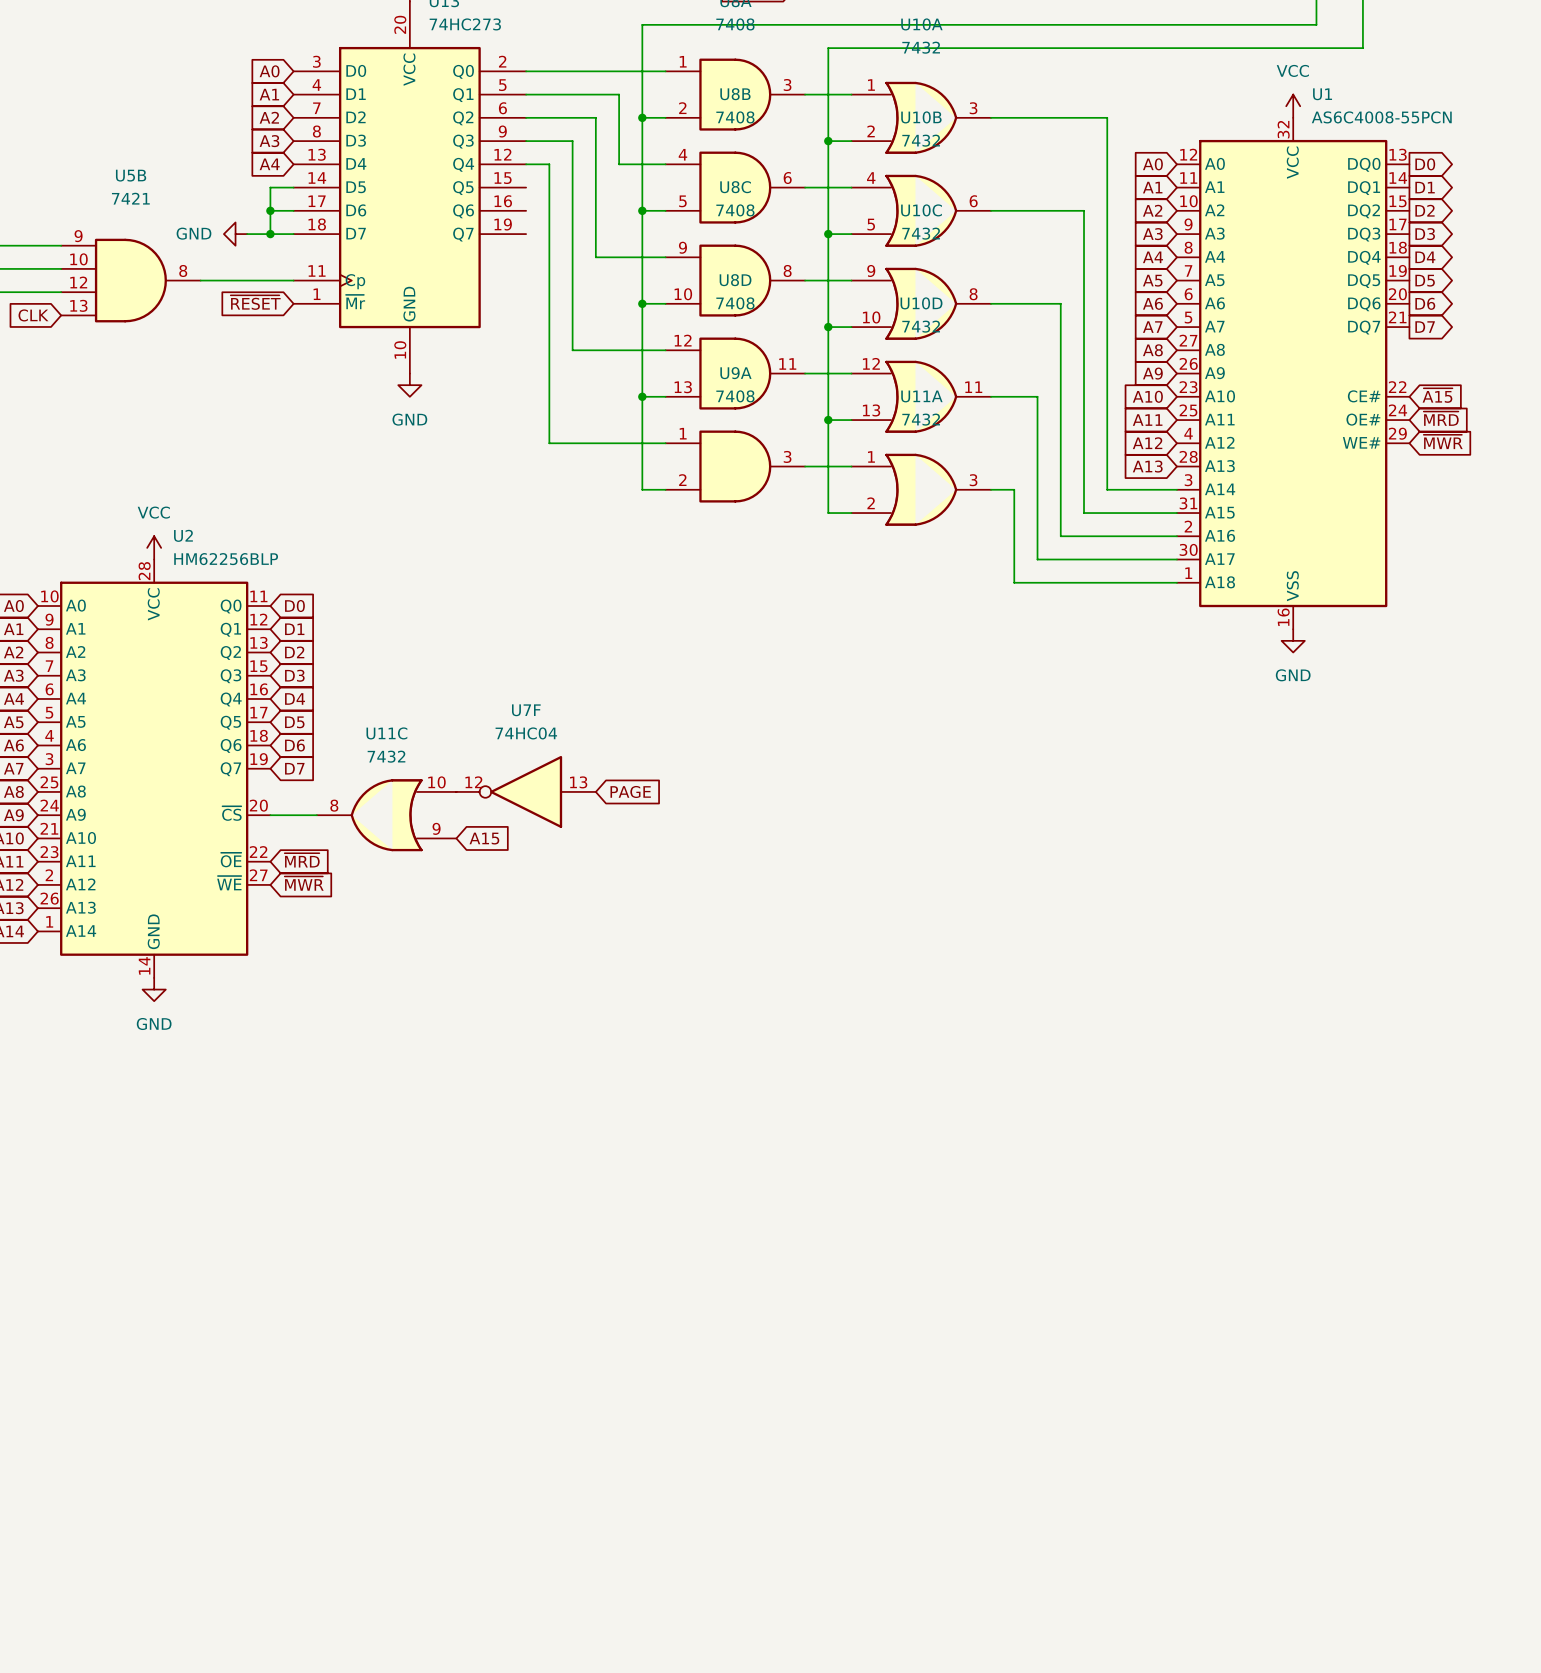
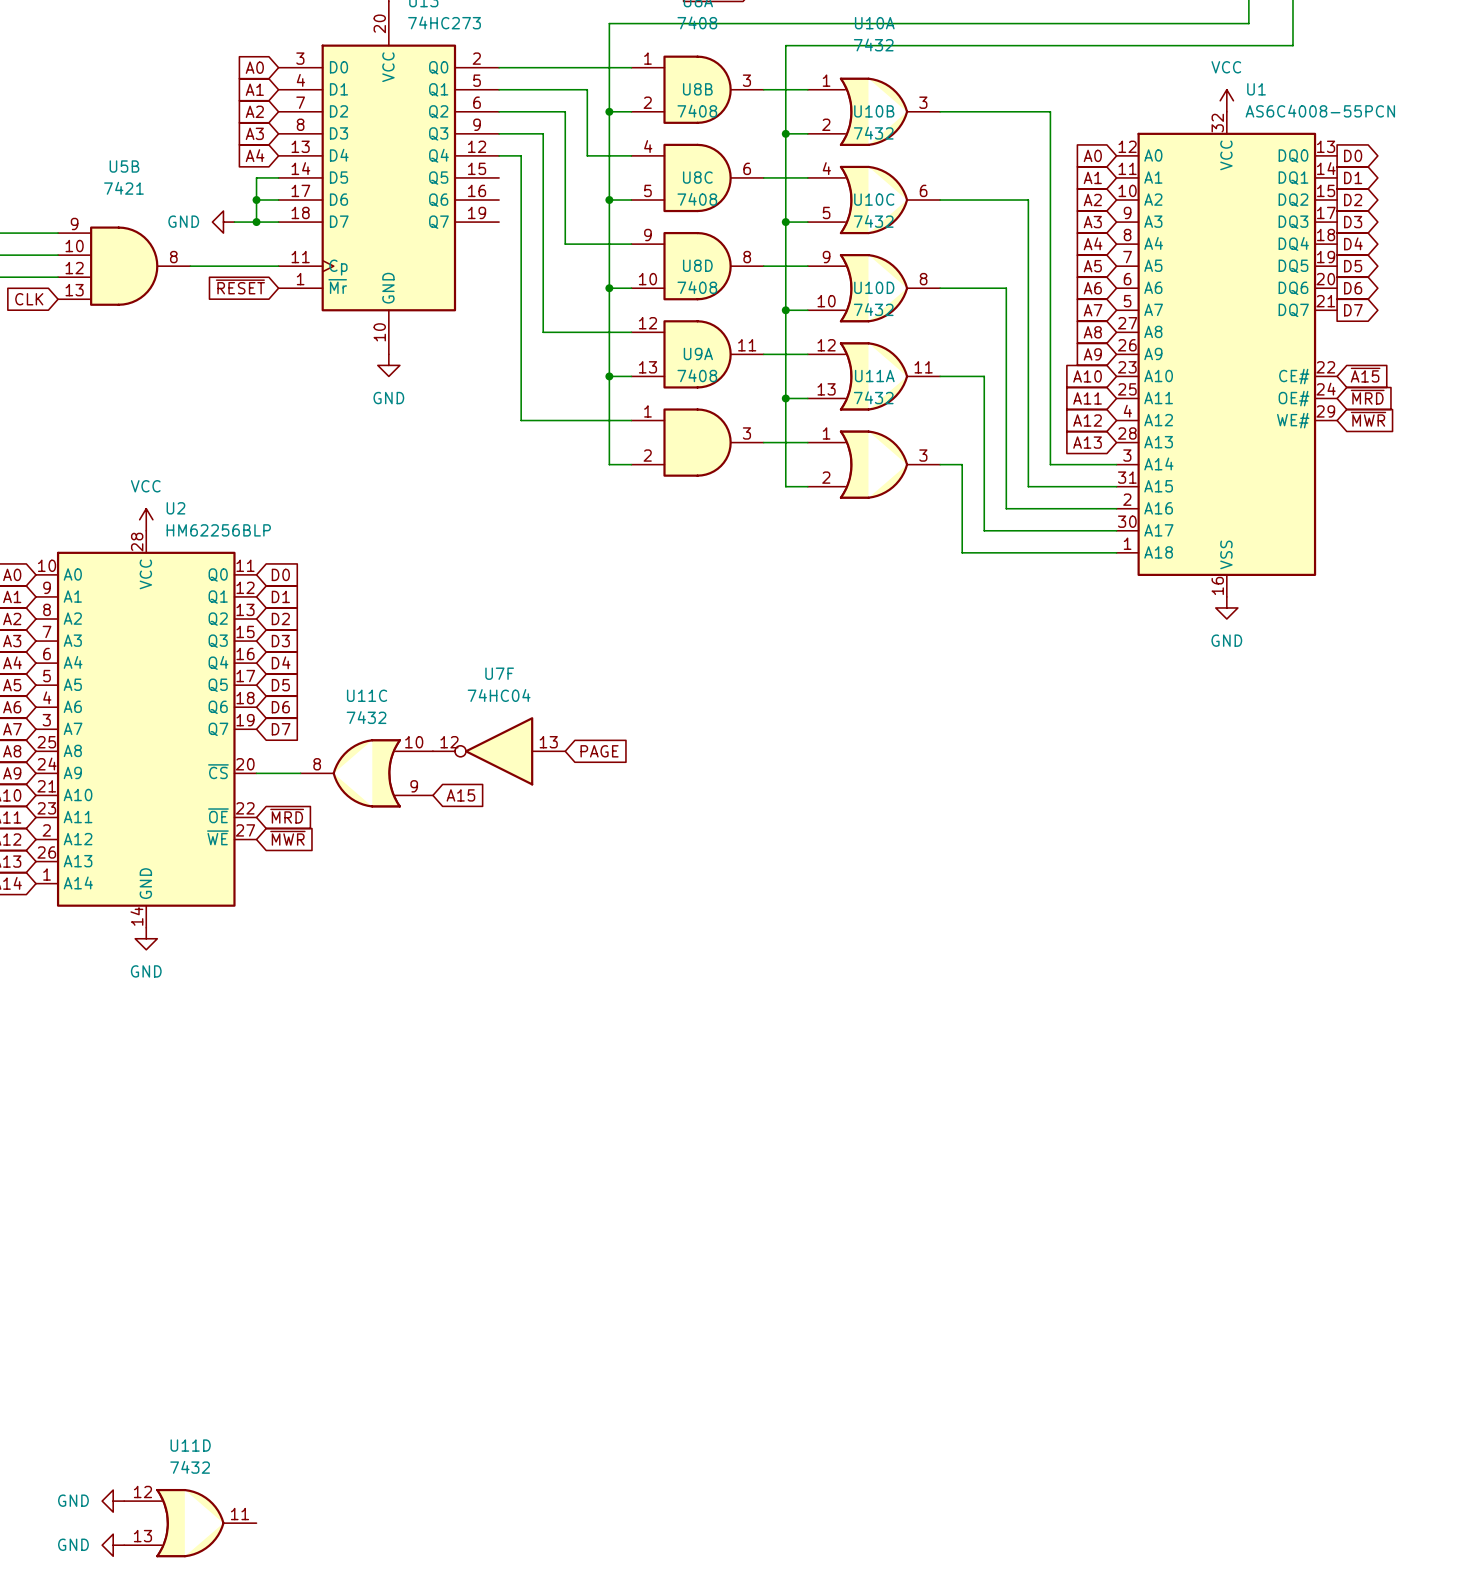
power symbol: none -> GND (113, 1501)
U11D: none -> 7432 (190, 1523)
power symbol: none -> GND (113, 1545)

